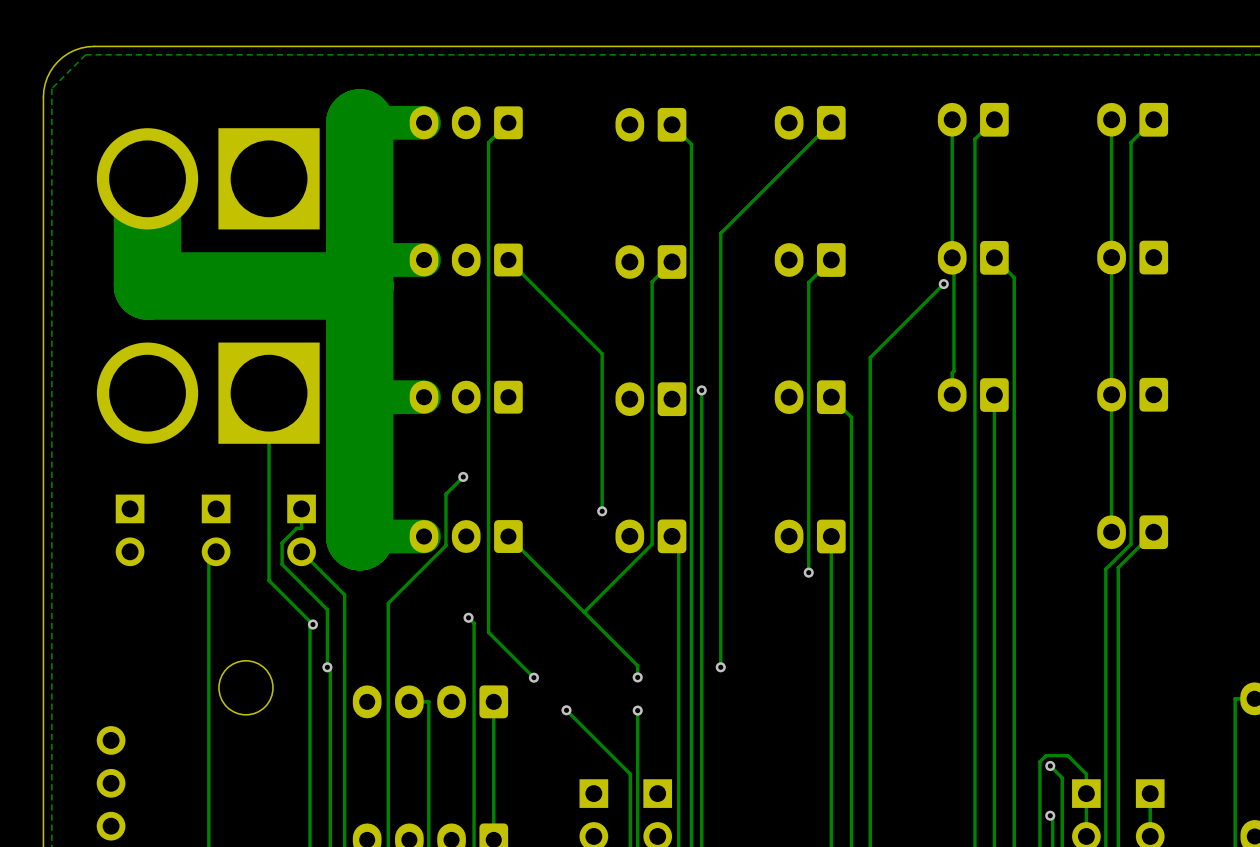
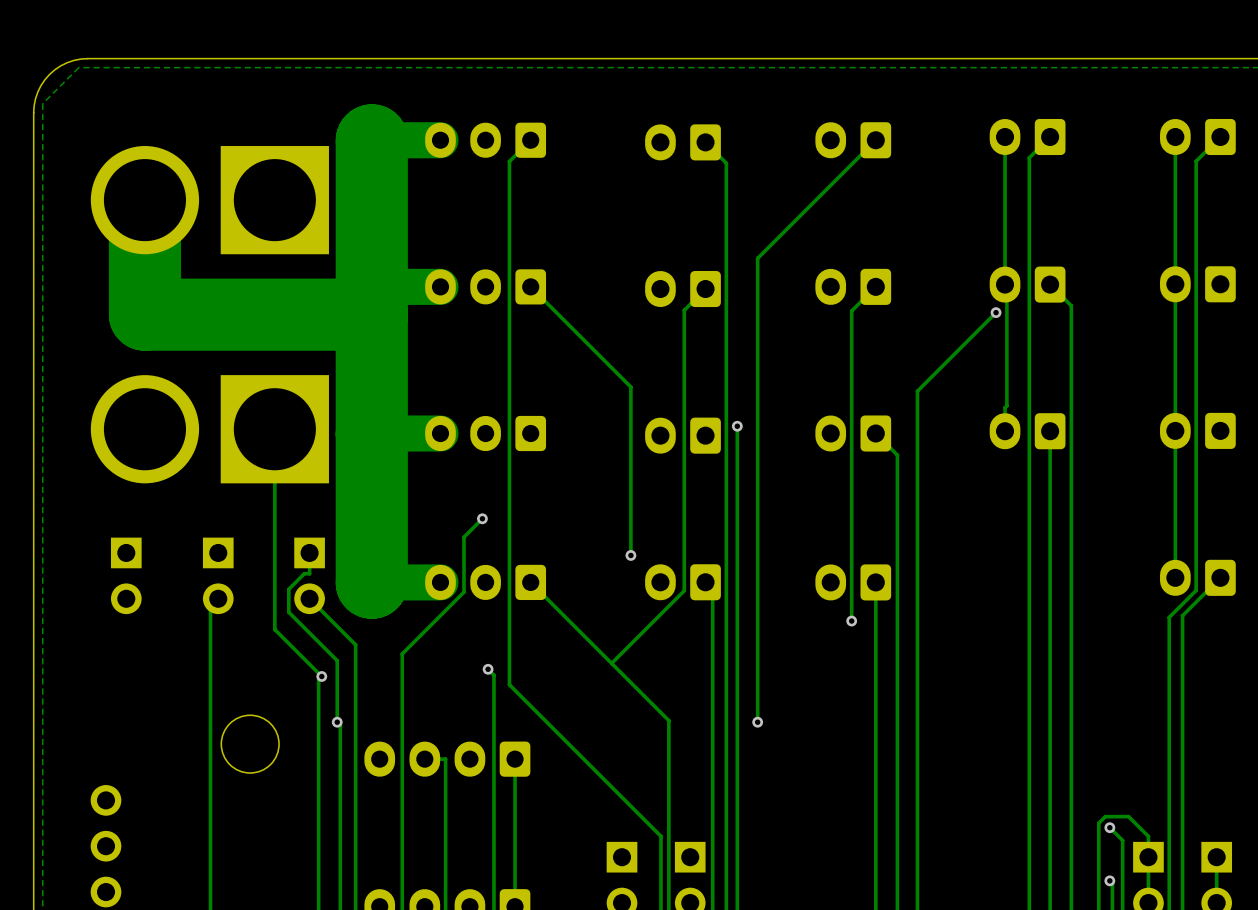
track: none -> (557, 733) (592, 768)
via: (533, 677) -> none
track: none -> (668, 733) (668, 768)
via: (637, 677) -> none
via: (566, 710) -> none
via: (637, 710) -> none

